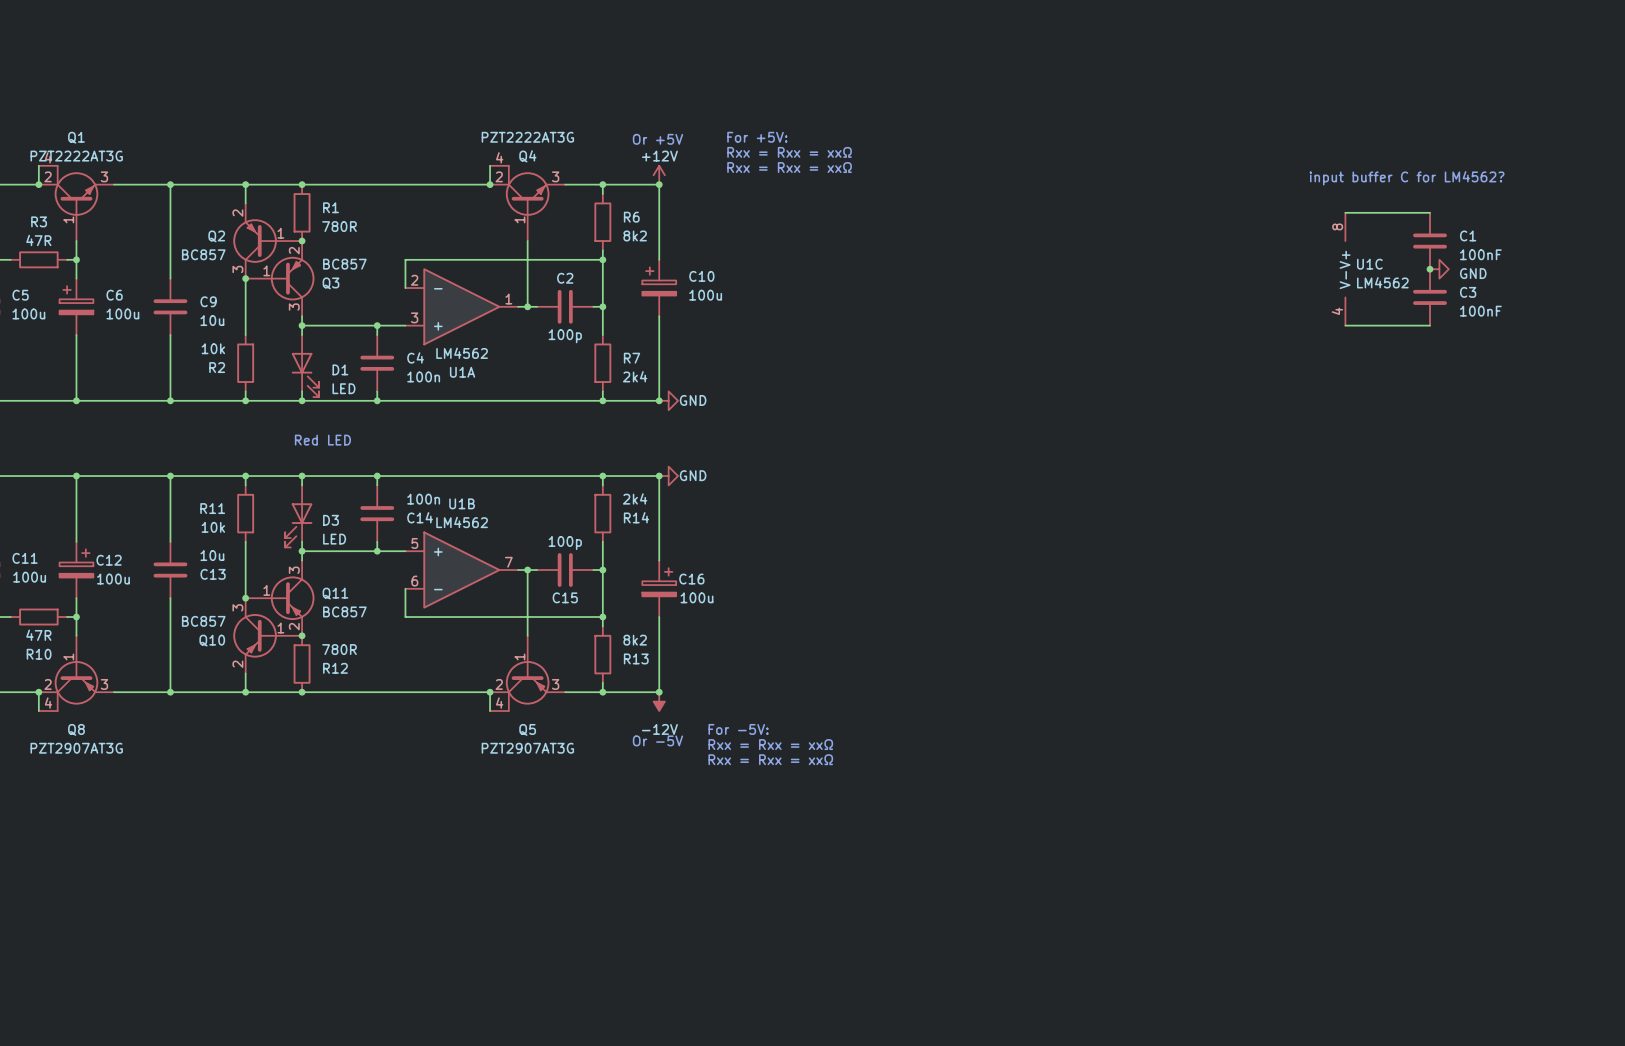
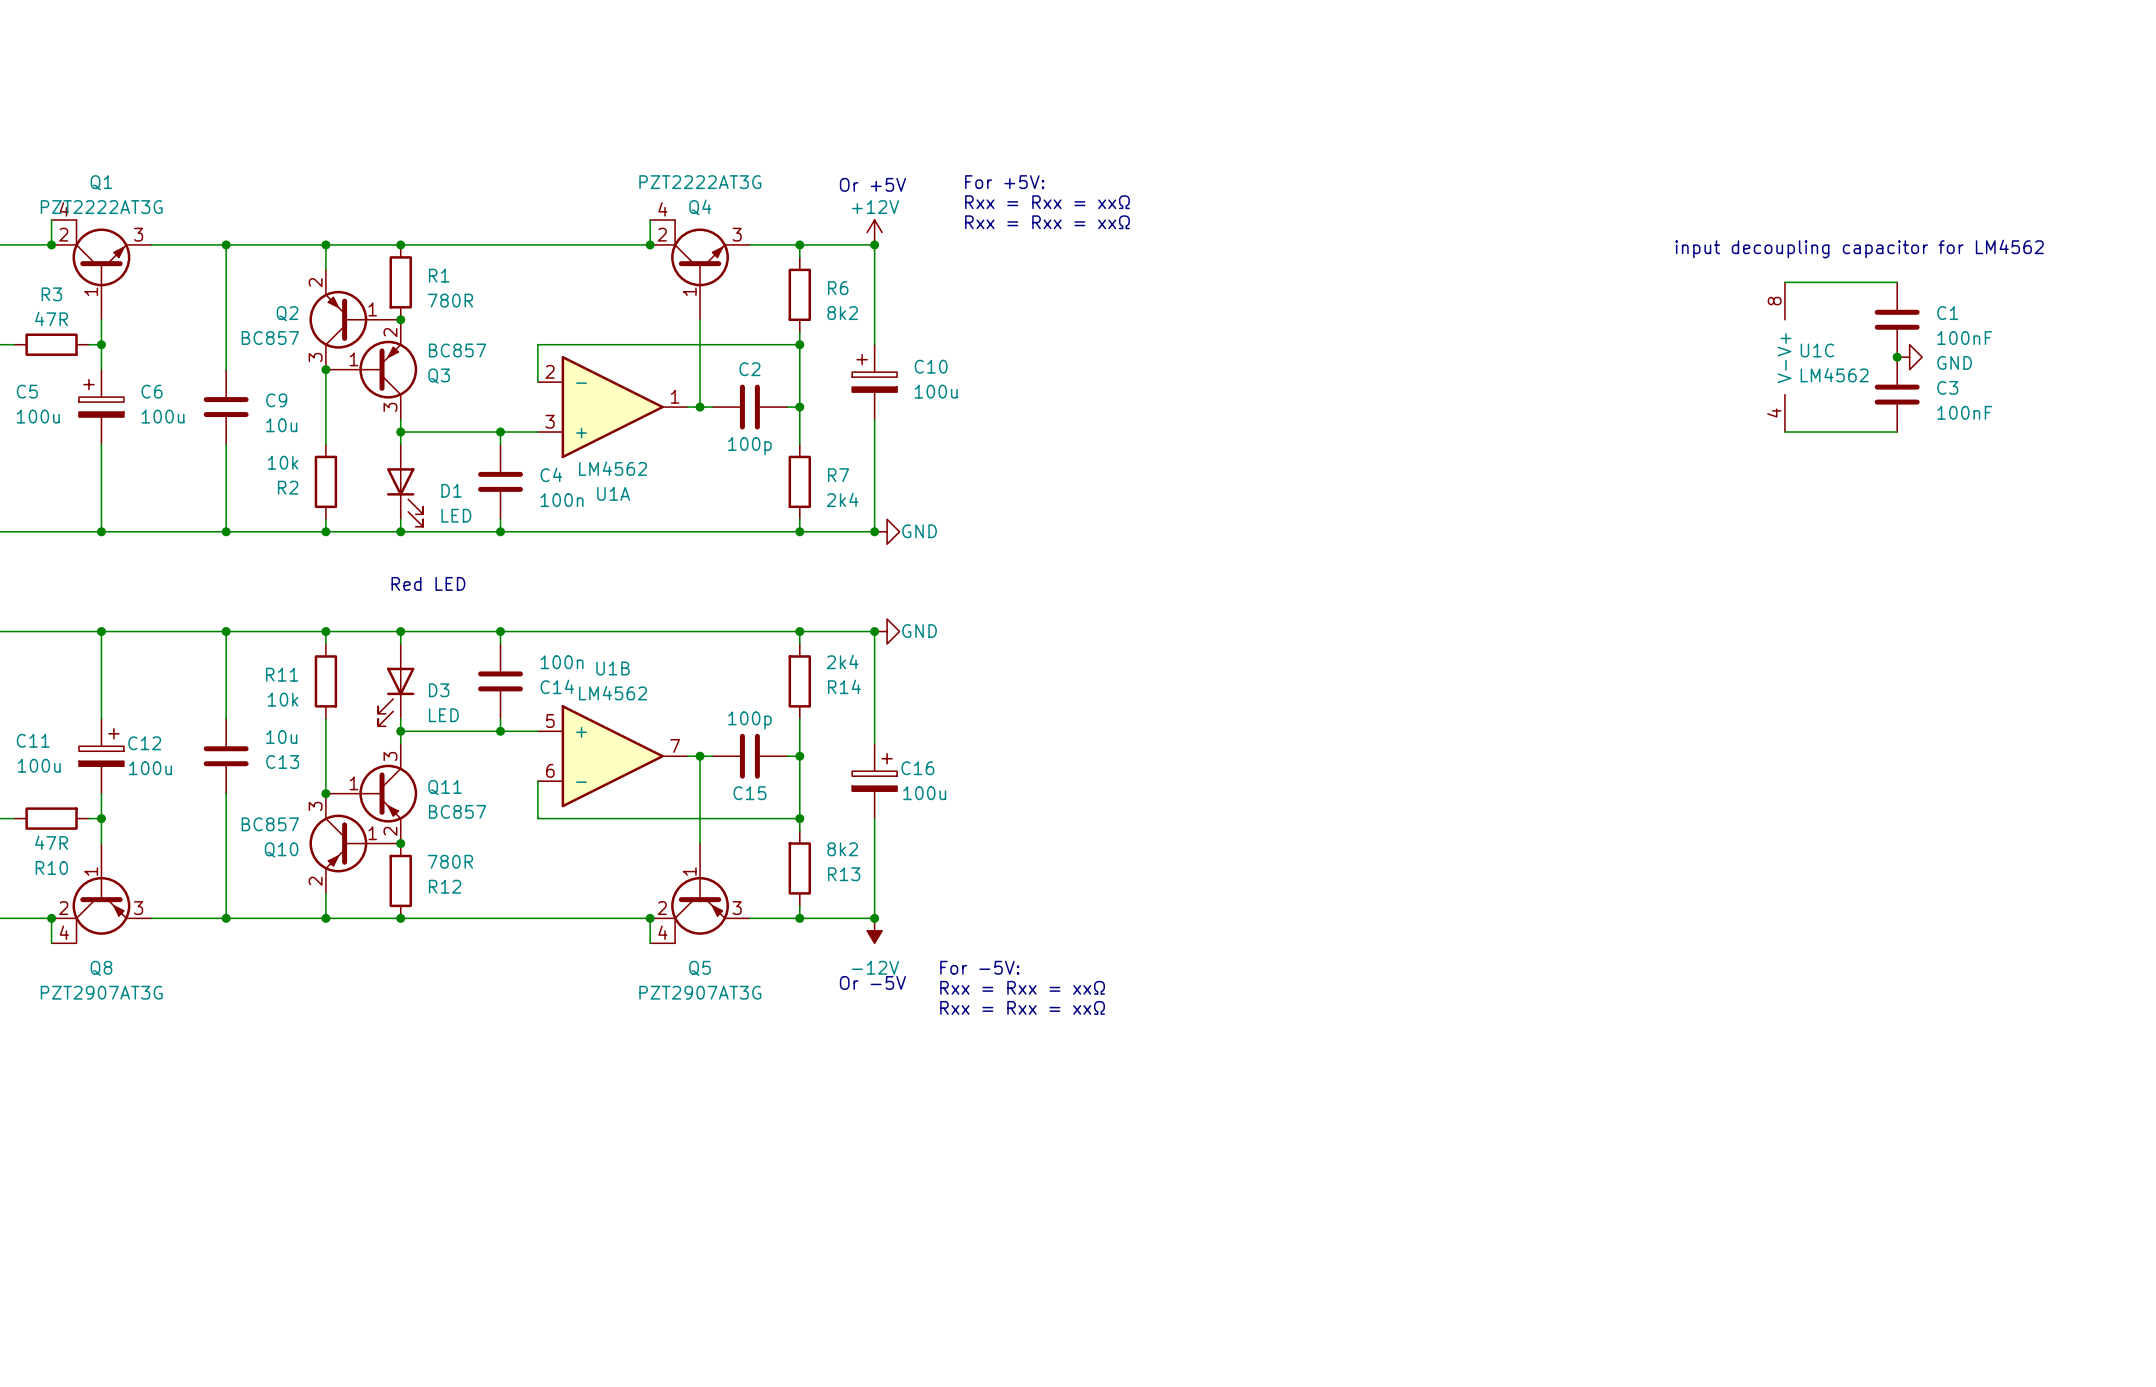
text: input buffer C for LM4562? (1407, 178) -> input decoupling capacitor for LM4562 (1859, 248)

